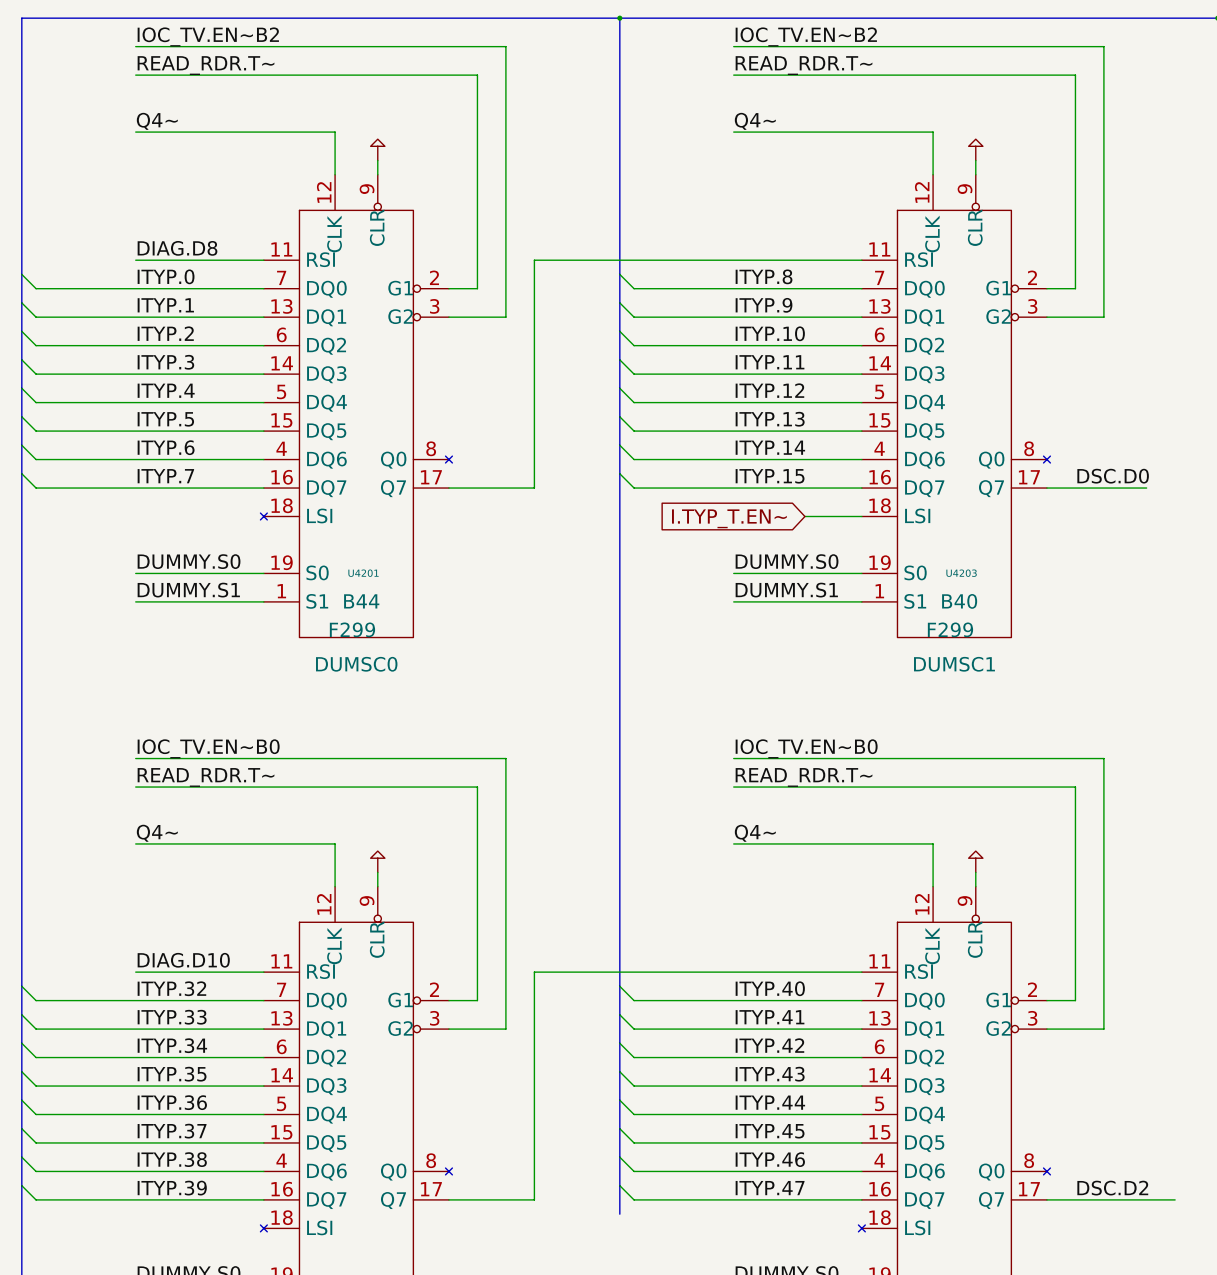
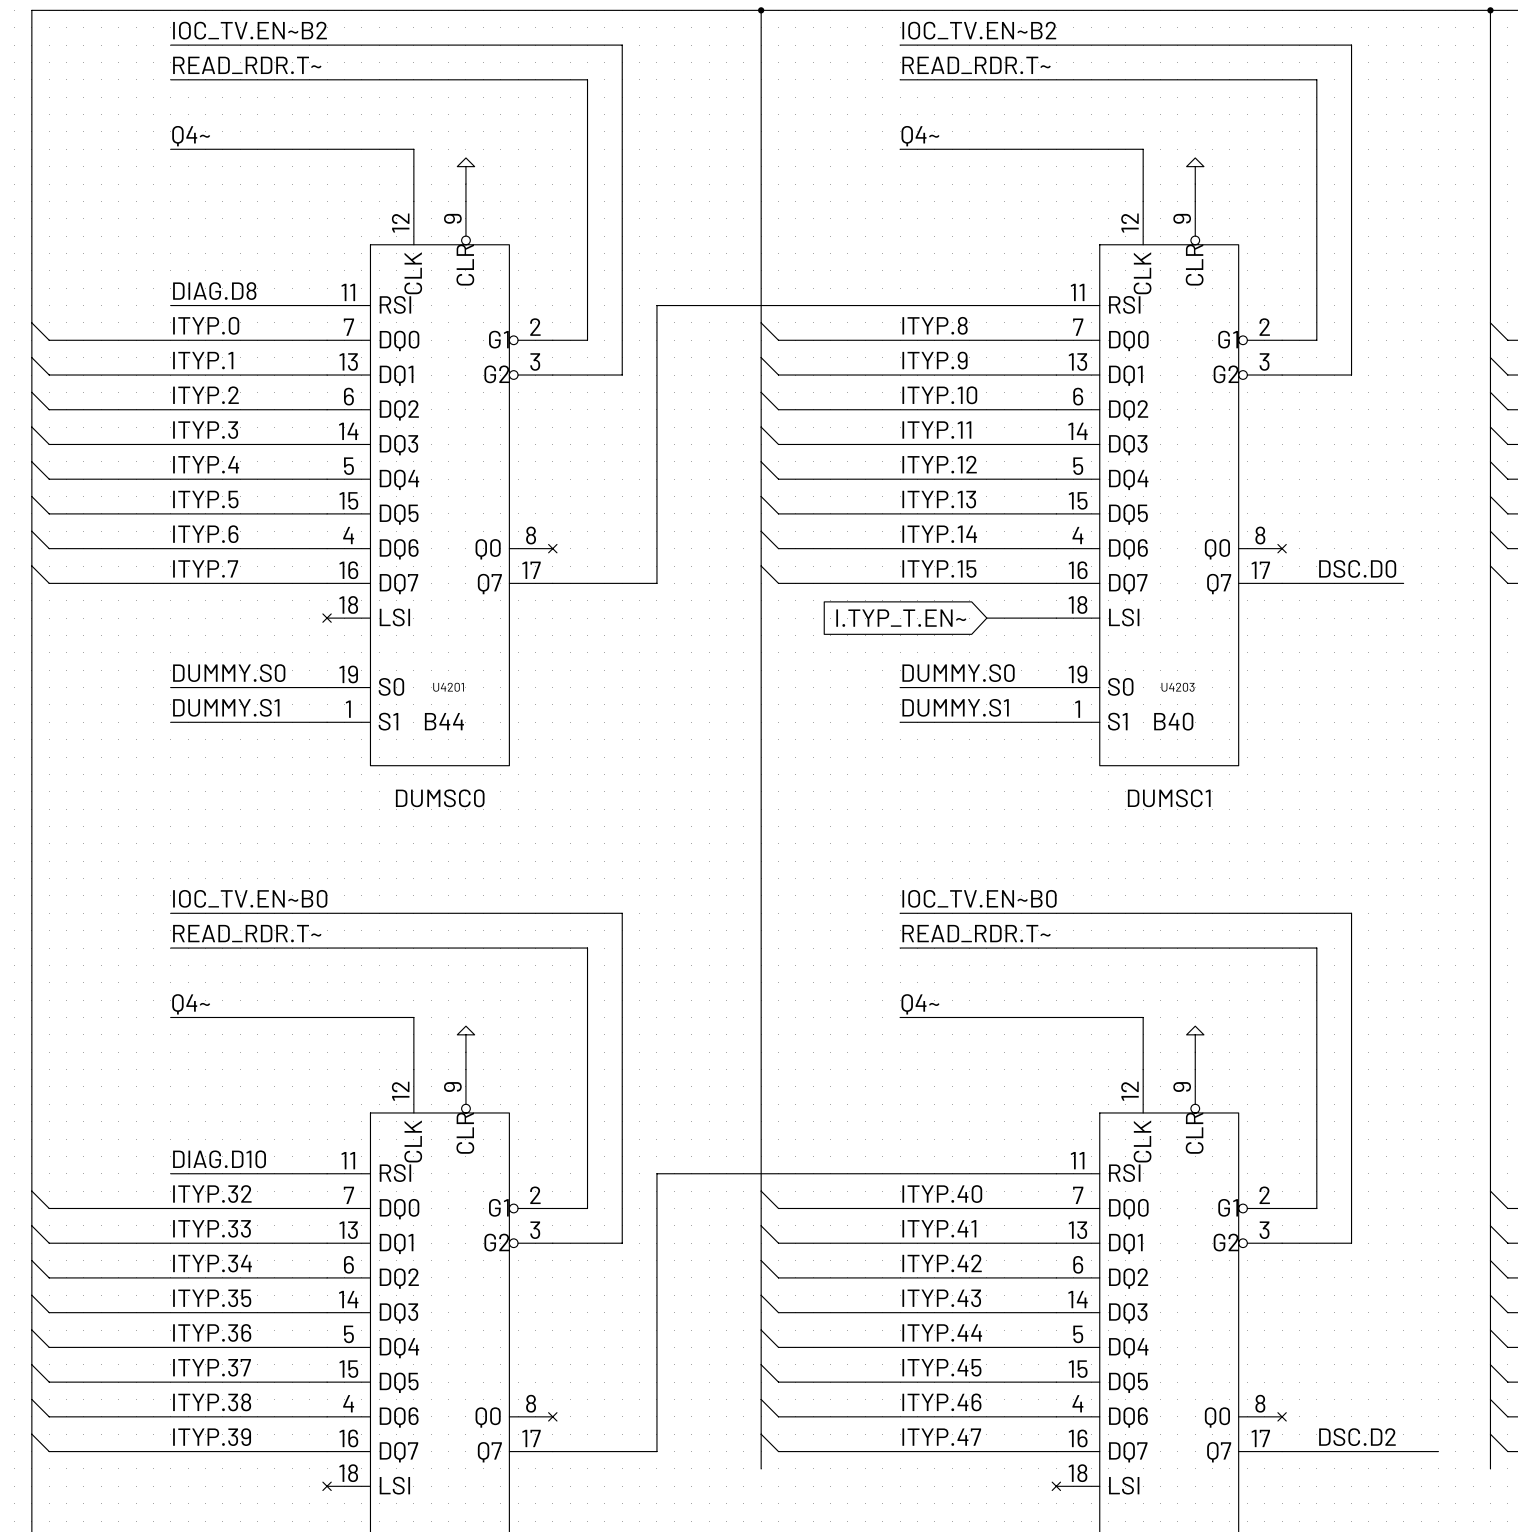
U4201 value: F299 (352, 629) -> none
U4203 value: F299 (950, 629) -> none

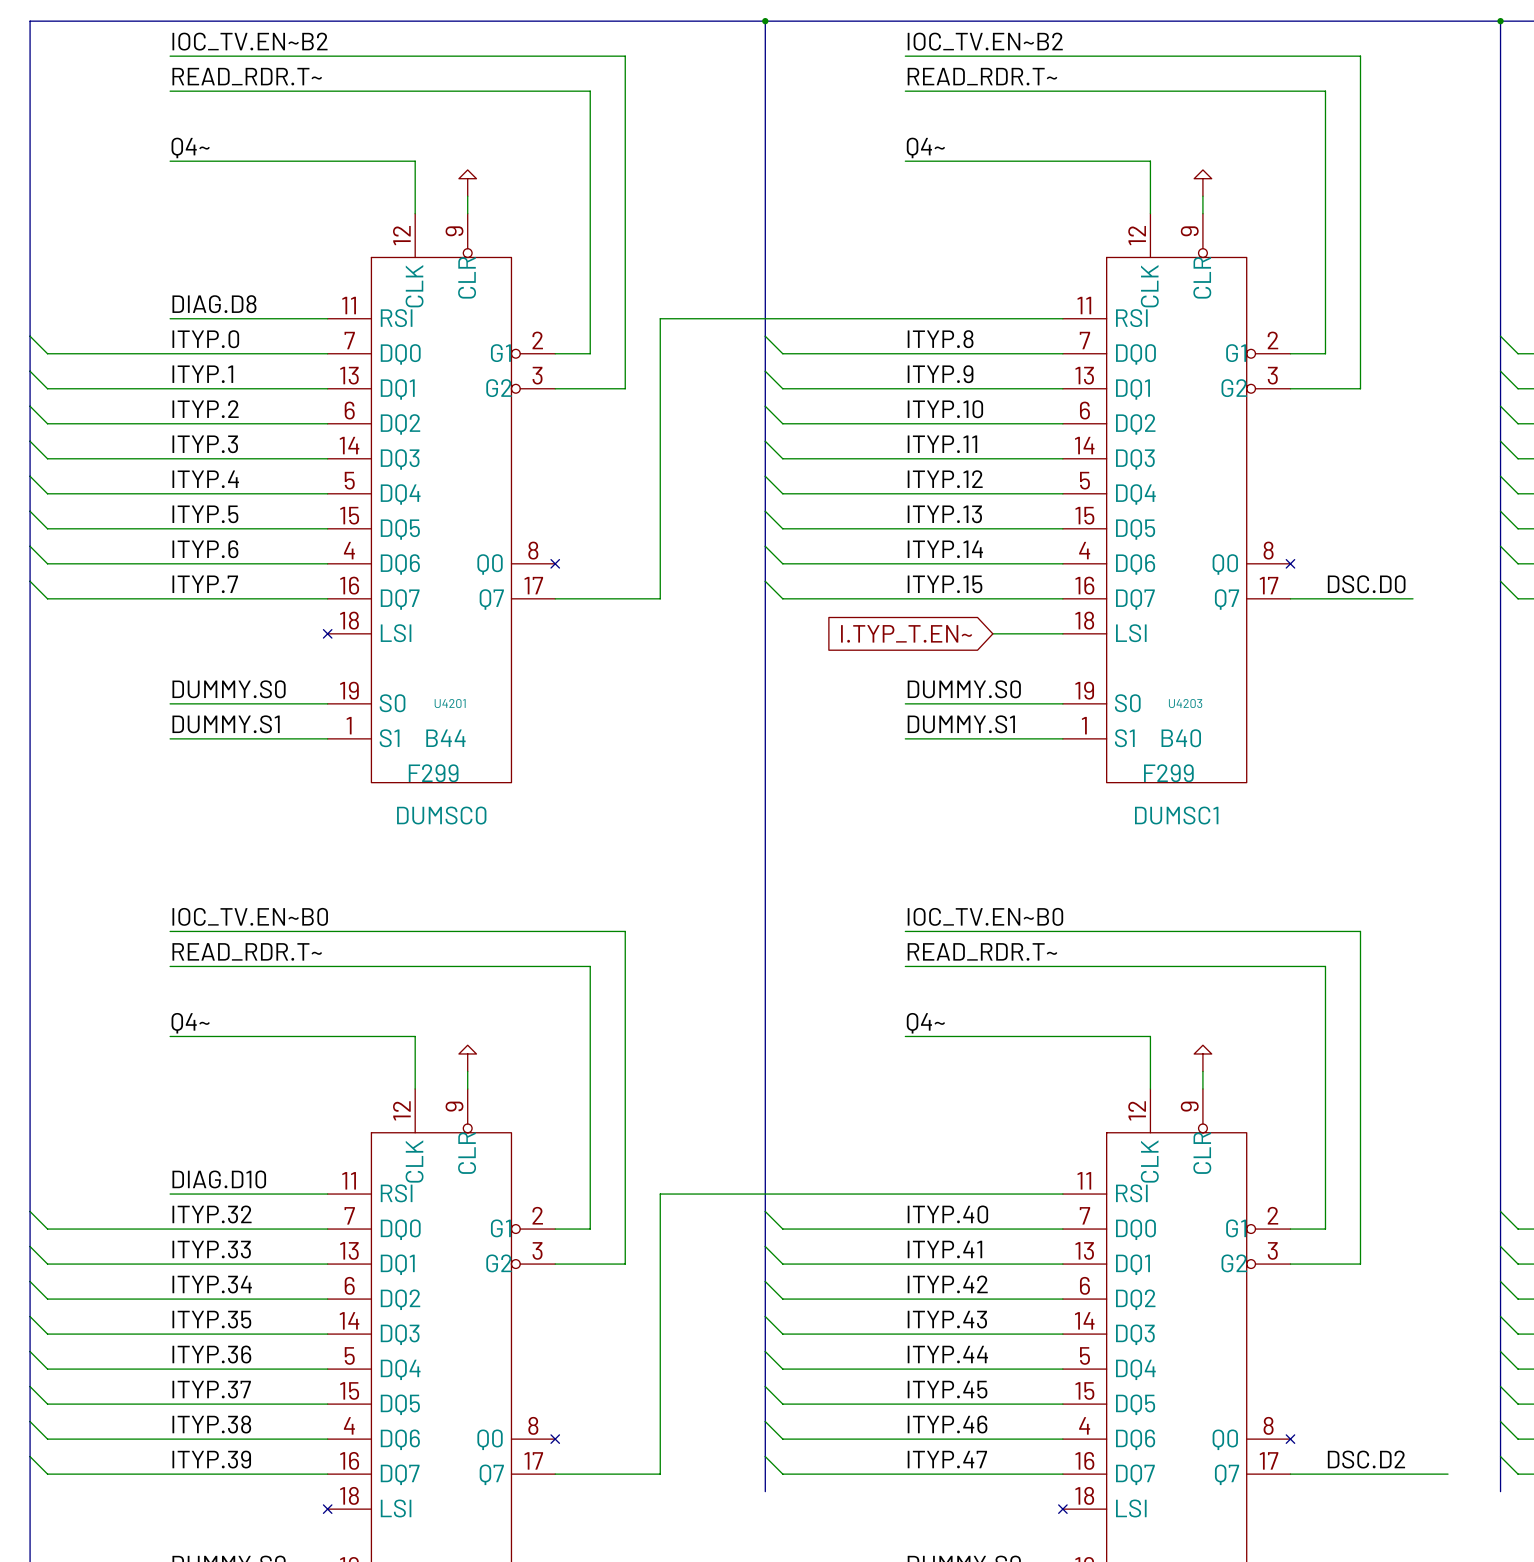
U4201 value: none -> F299 (433, 773)
U4203 value: none -> F299 (1168, 773)

